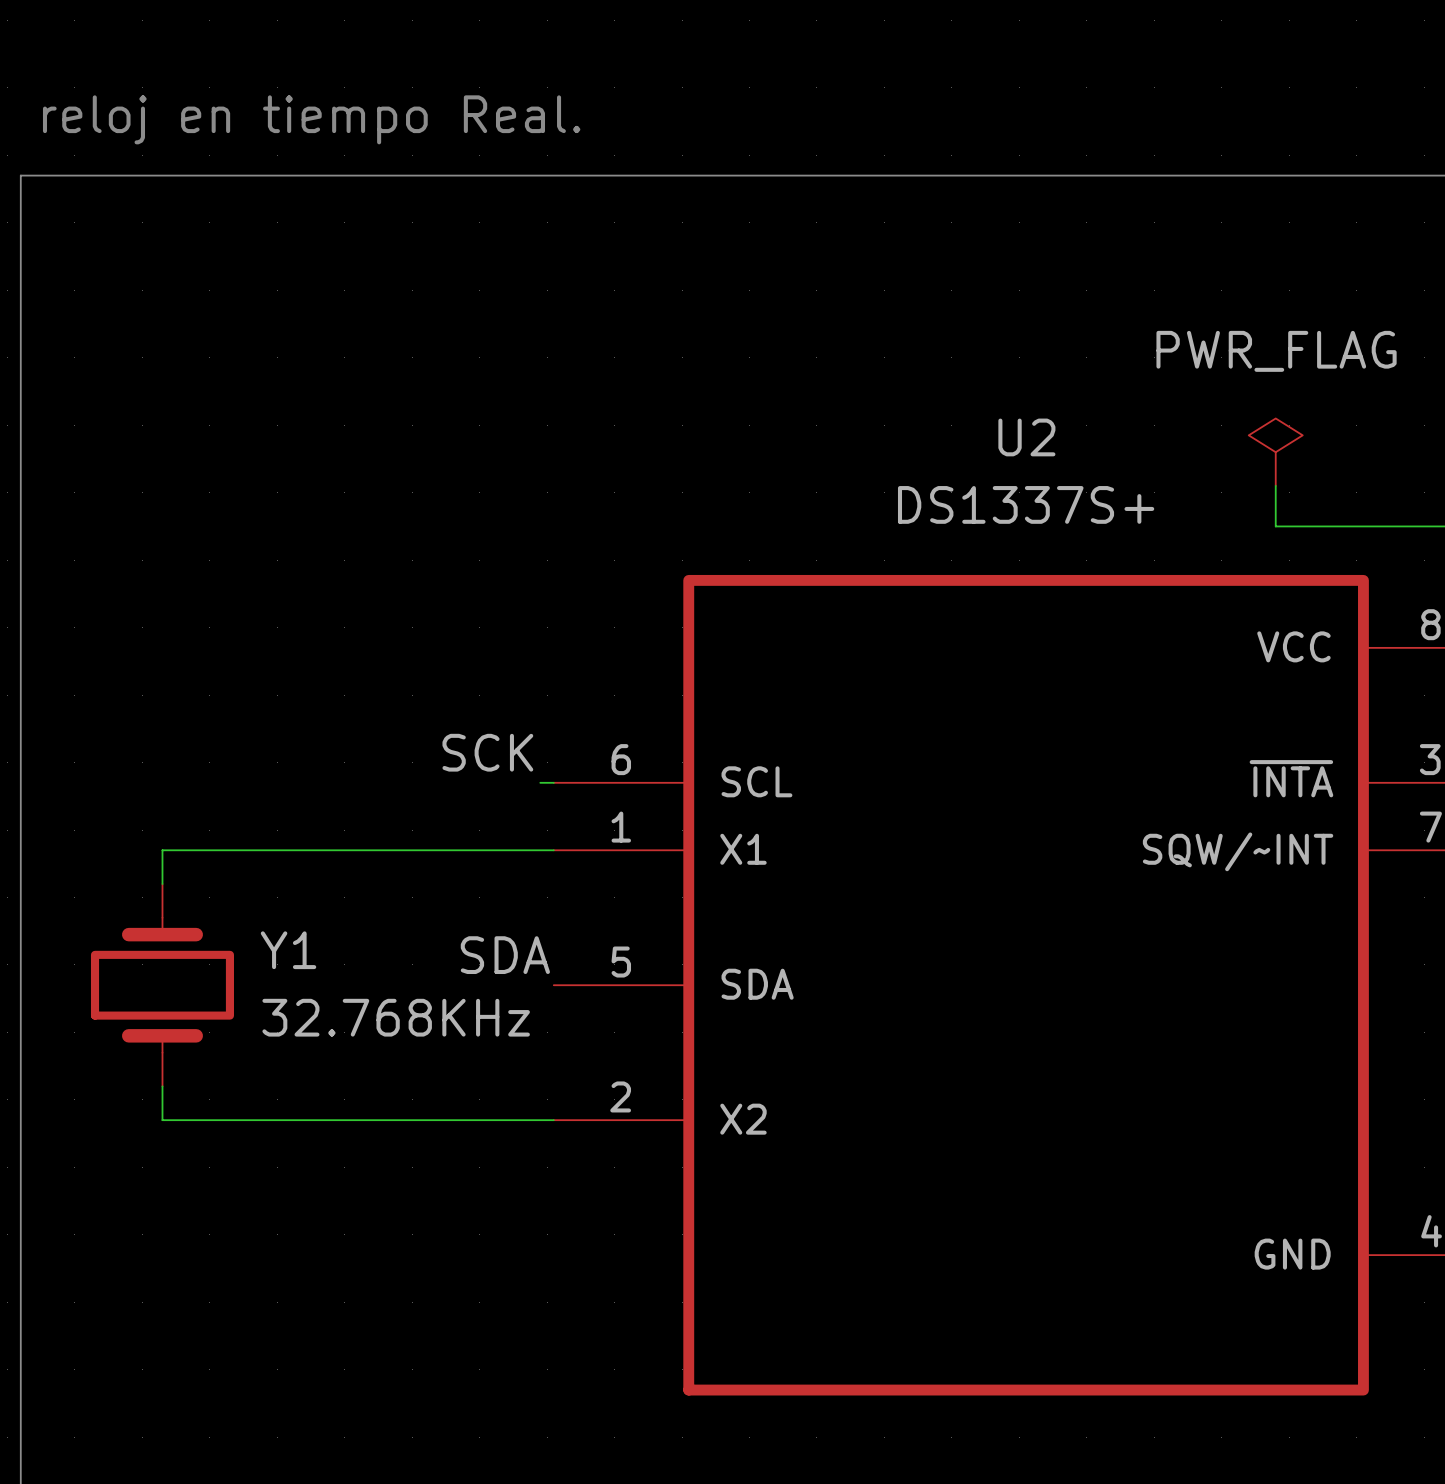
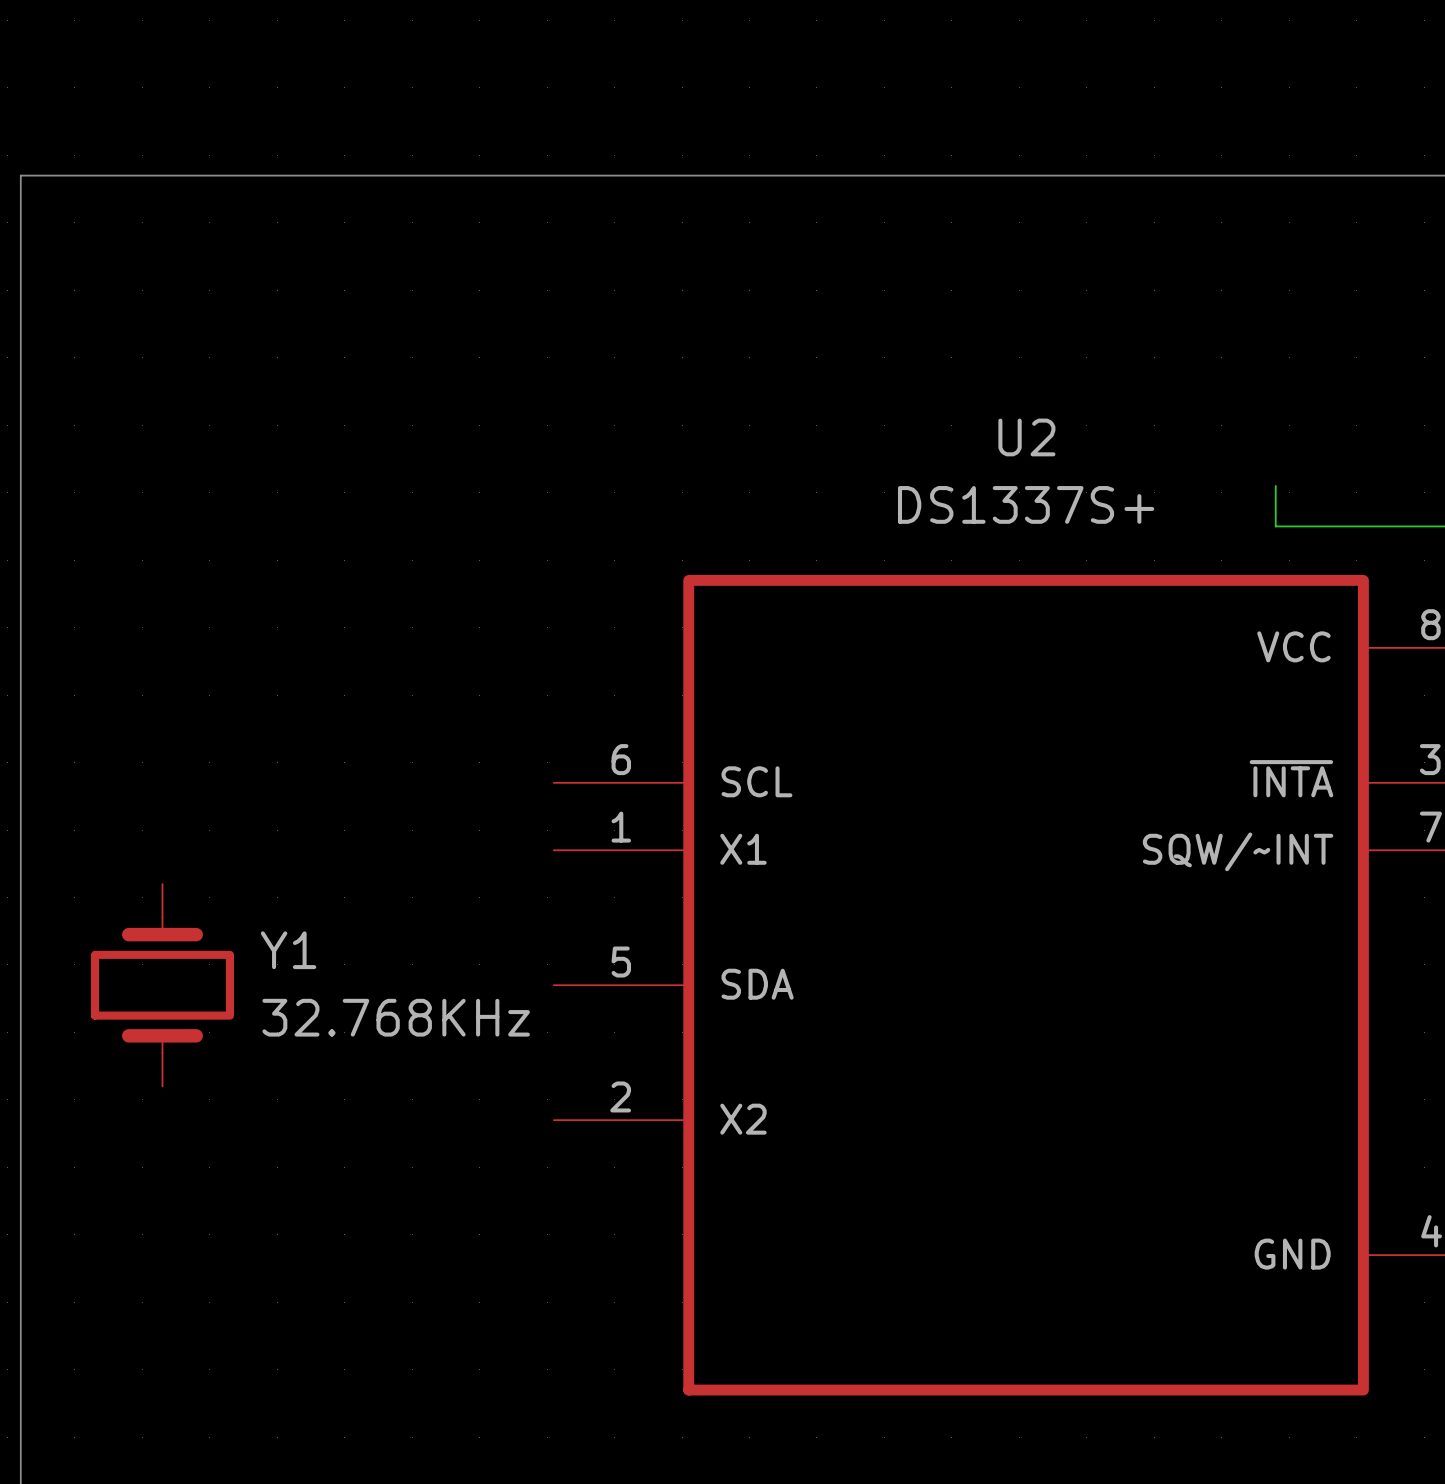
text: reloj en tiempo Real. (311, 119) -> none
power symbol: PWR_FLAG (1275, 452) -> none
label: SCK (487, 752) -> none
wire: (540, 782) (553, 782) -> none
wire: (553, 850) (162, 850) (162, 884) -> none
label: SDA (505, 955) -> none
wire: (162, 1086) (162, 1120) (553, 1120) -> none

